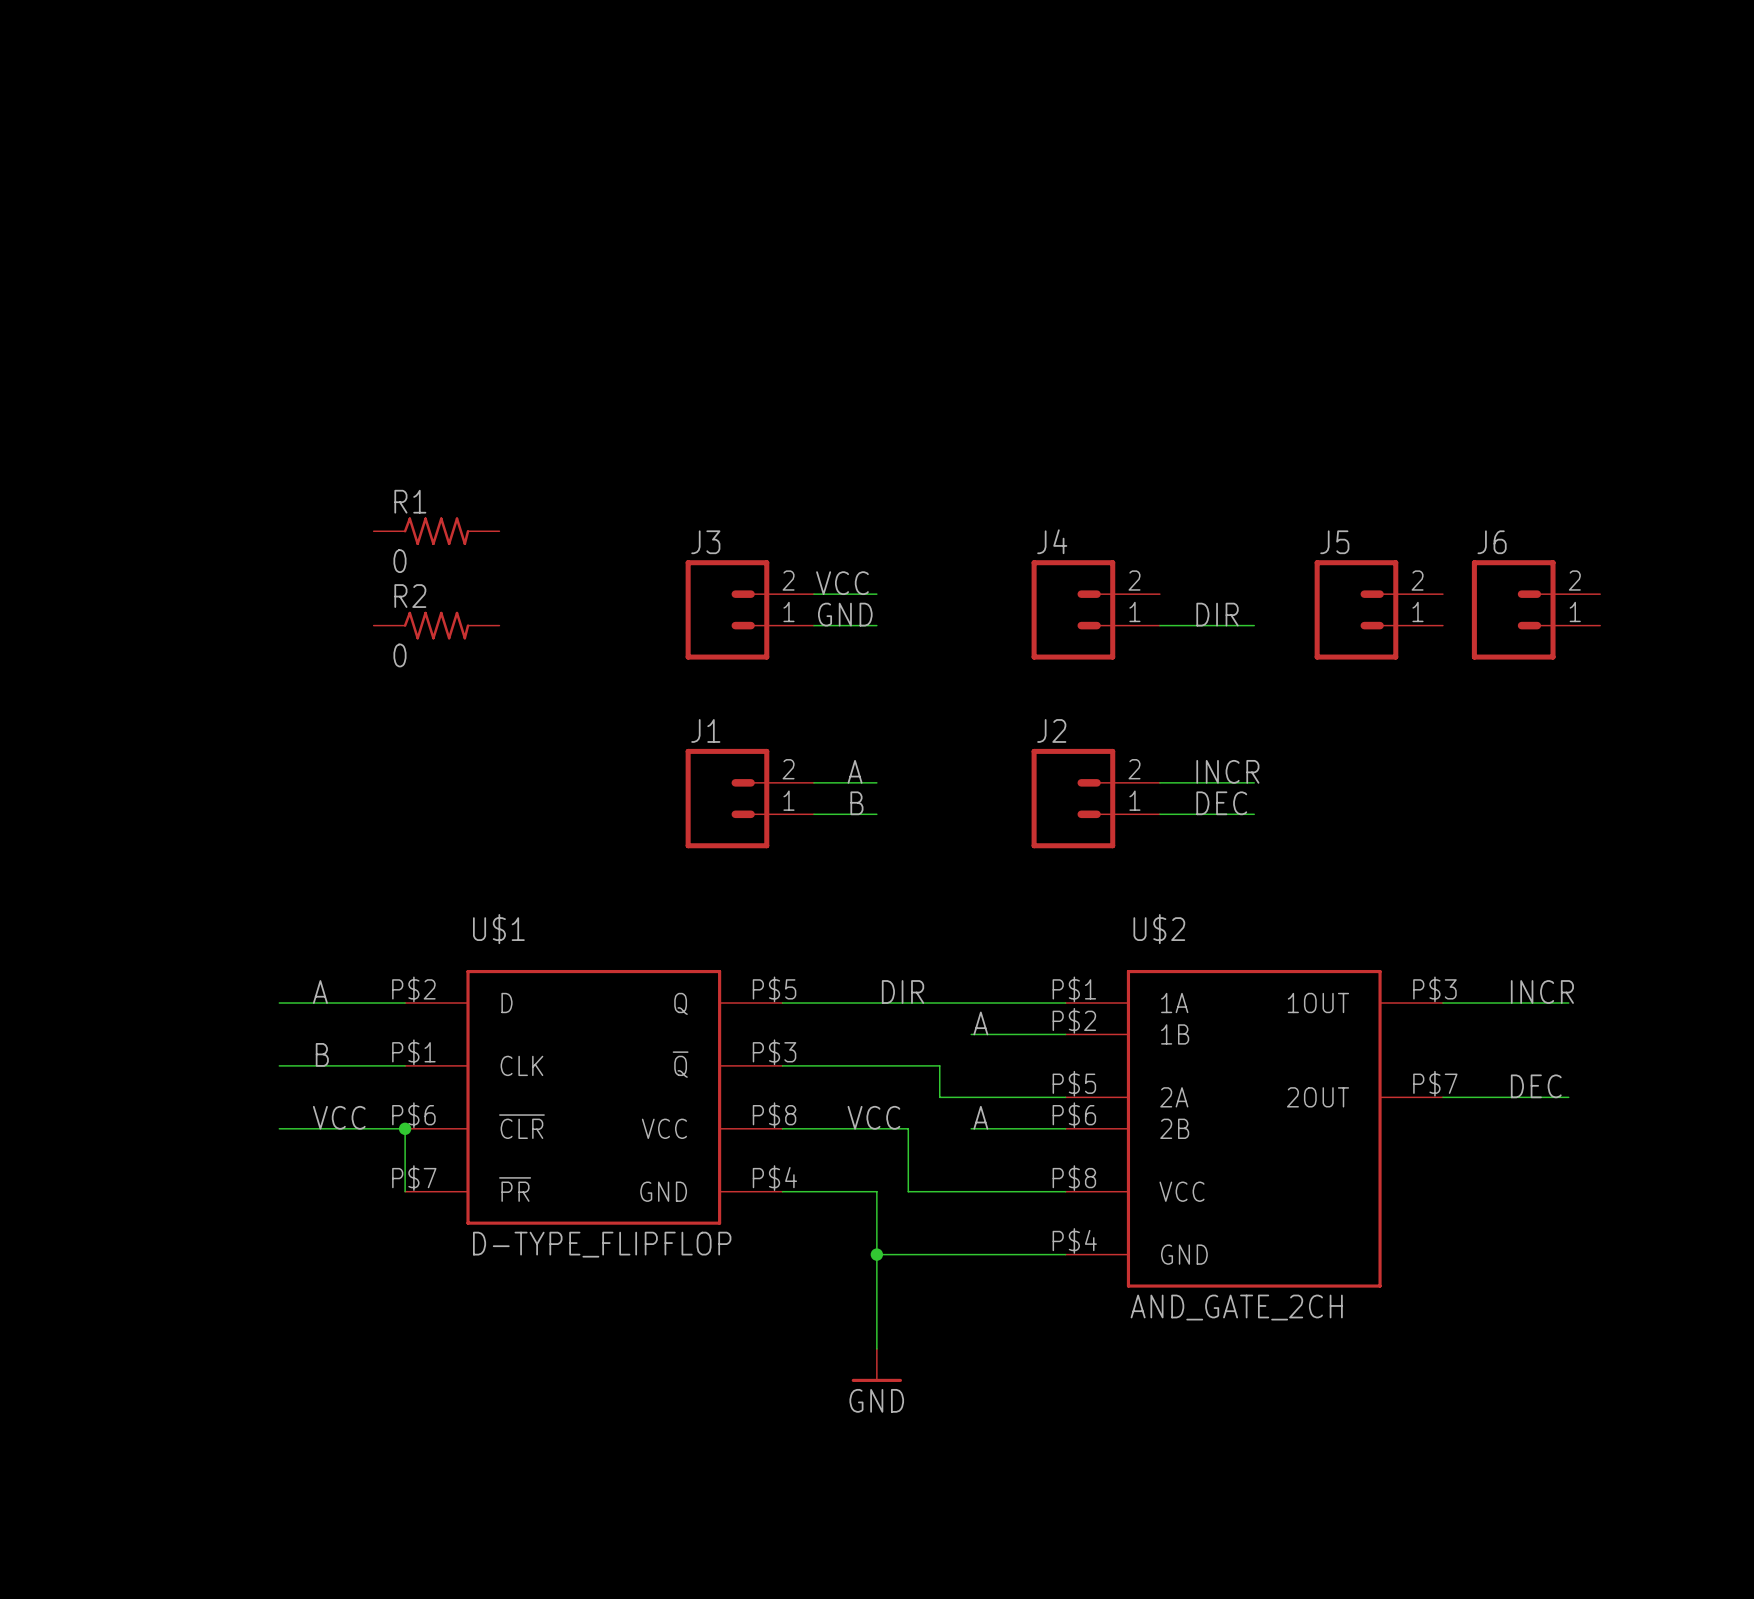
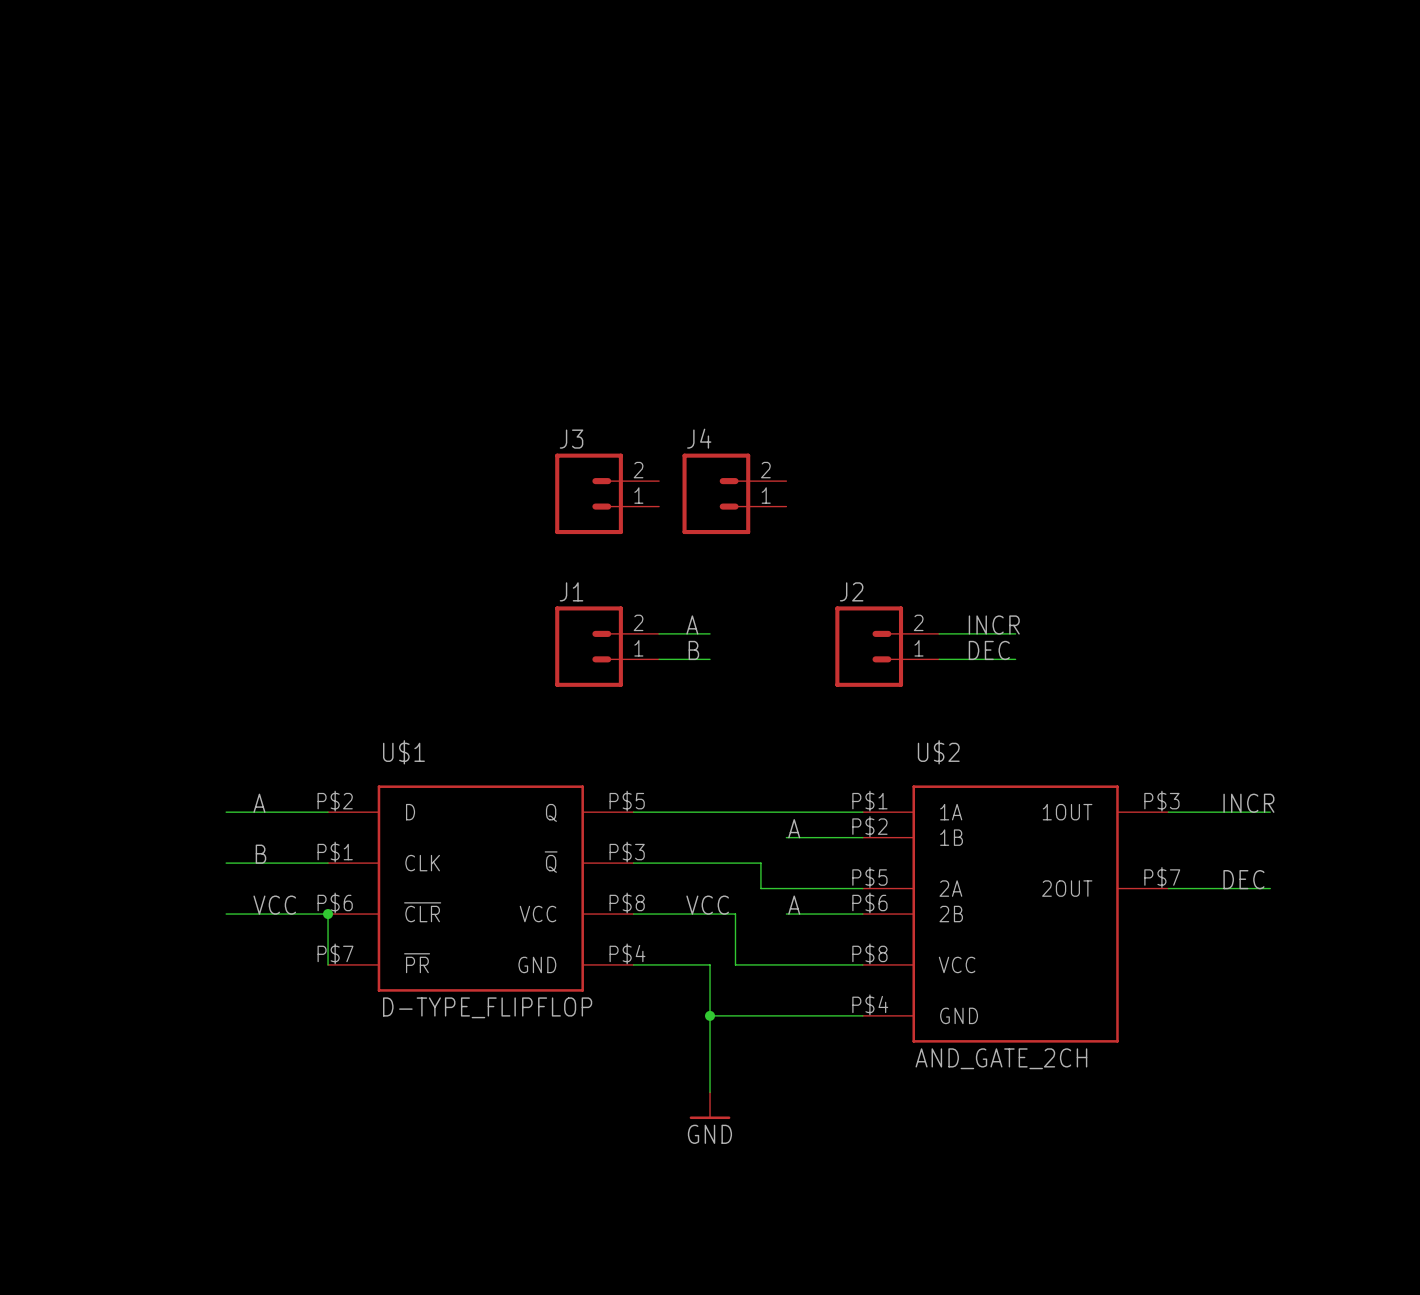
R1: 0 (436, 531) -> none
label: VCC (842, 583) -> none
wire: (813, 594) (876, 594) -> none
J4 position: (1095, 609) -> (734, 493)
J5: (1378, 609) -> none
J6: (1536, 609) -> none
label: GND (845, 614) -> none
label: DIR (1217, 614) -> none
R2: 0 (436, 625) -> none
wire: (813, 625) (876, 625) -> none
wire: (1159, 625) (1254, 625) -> none
label: DIR (903, 991) -> none

